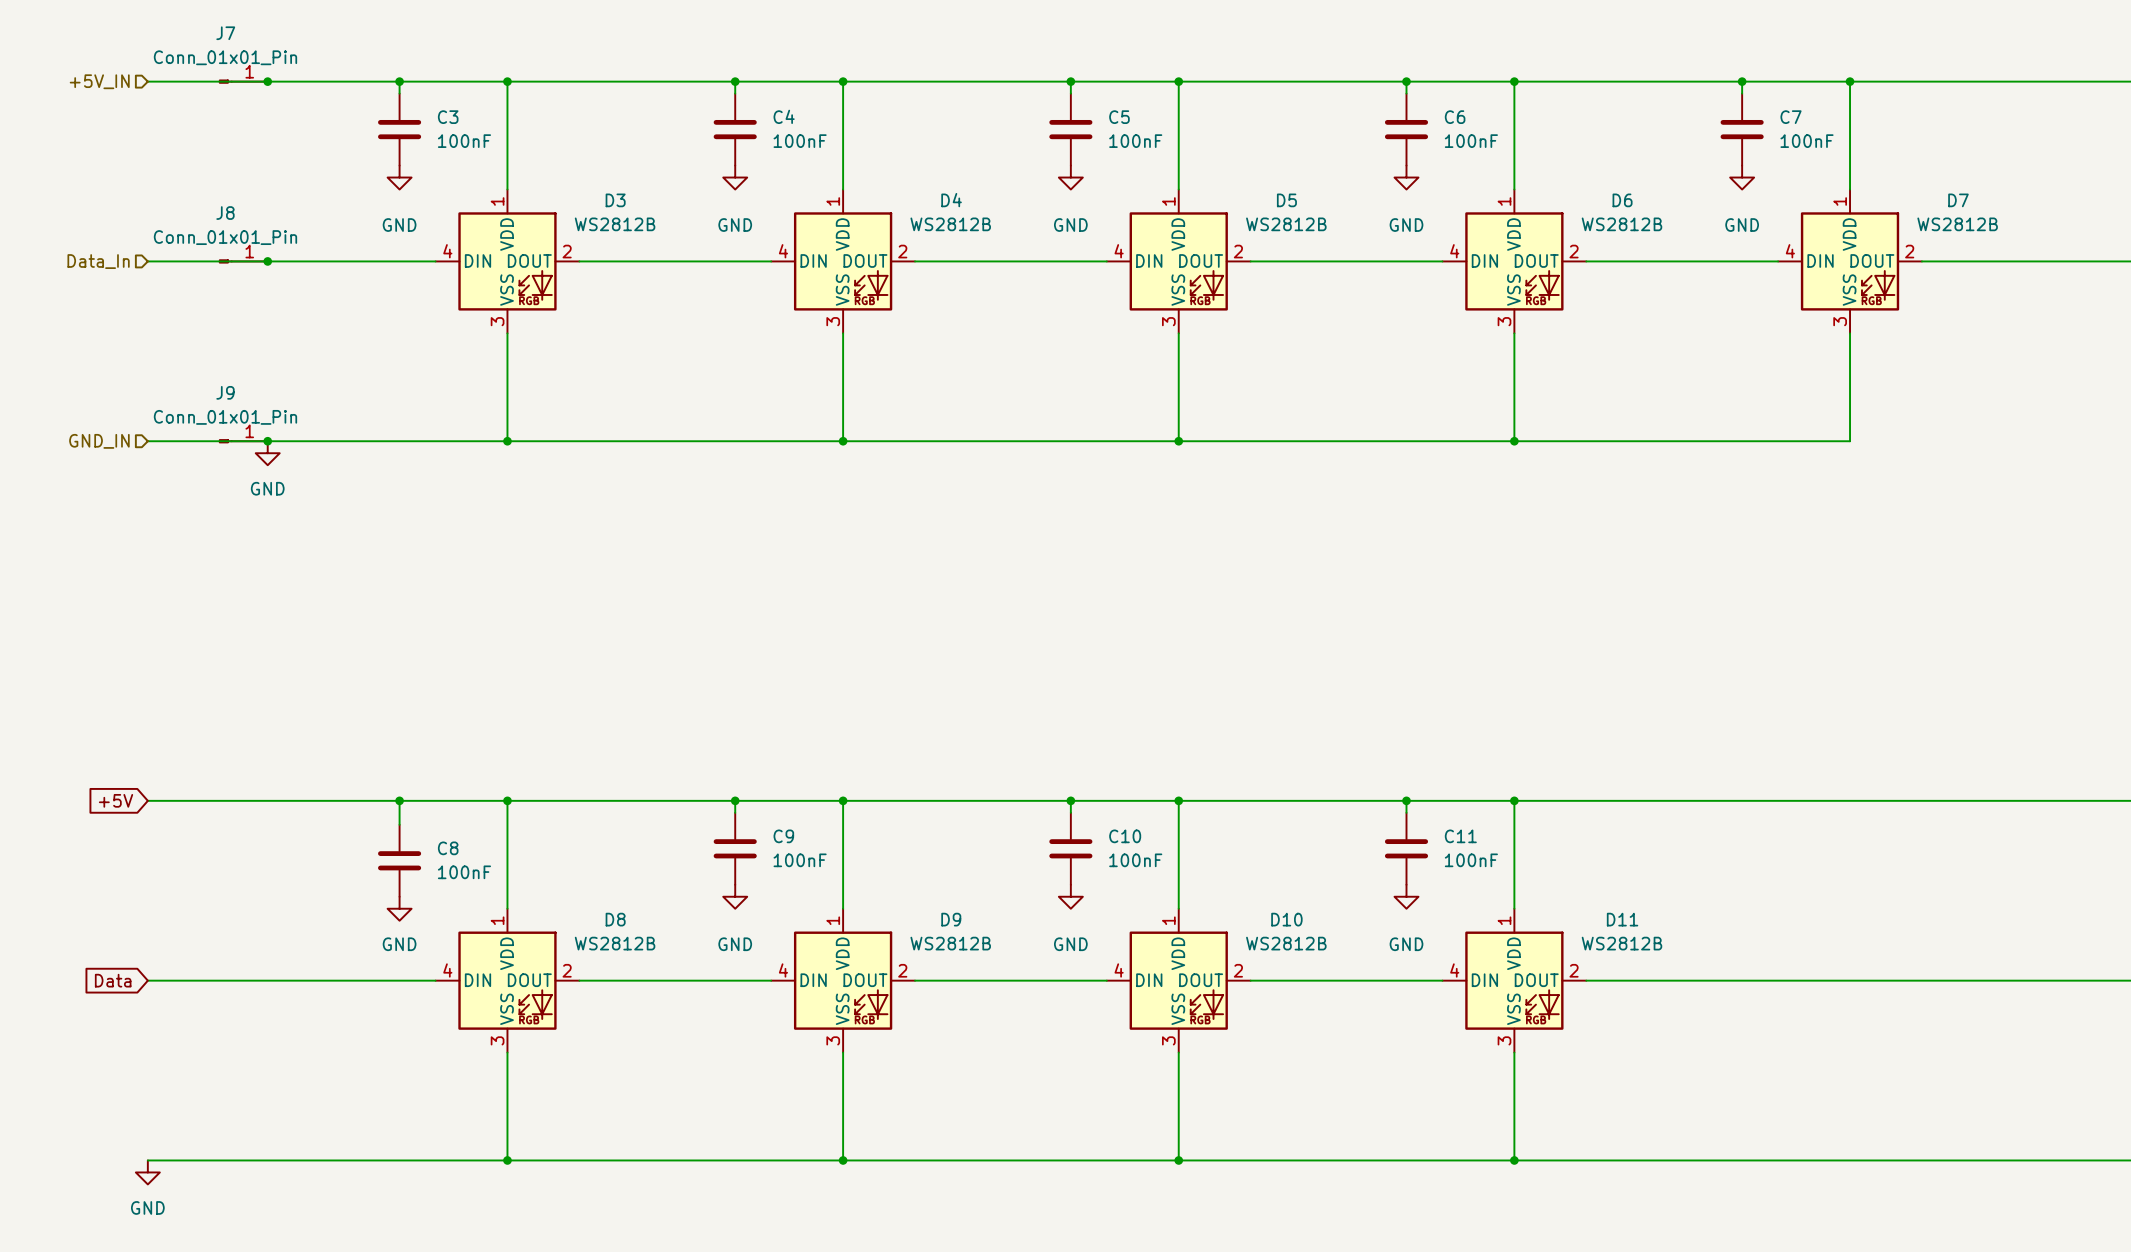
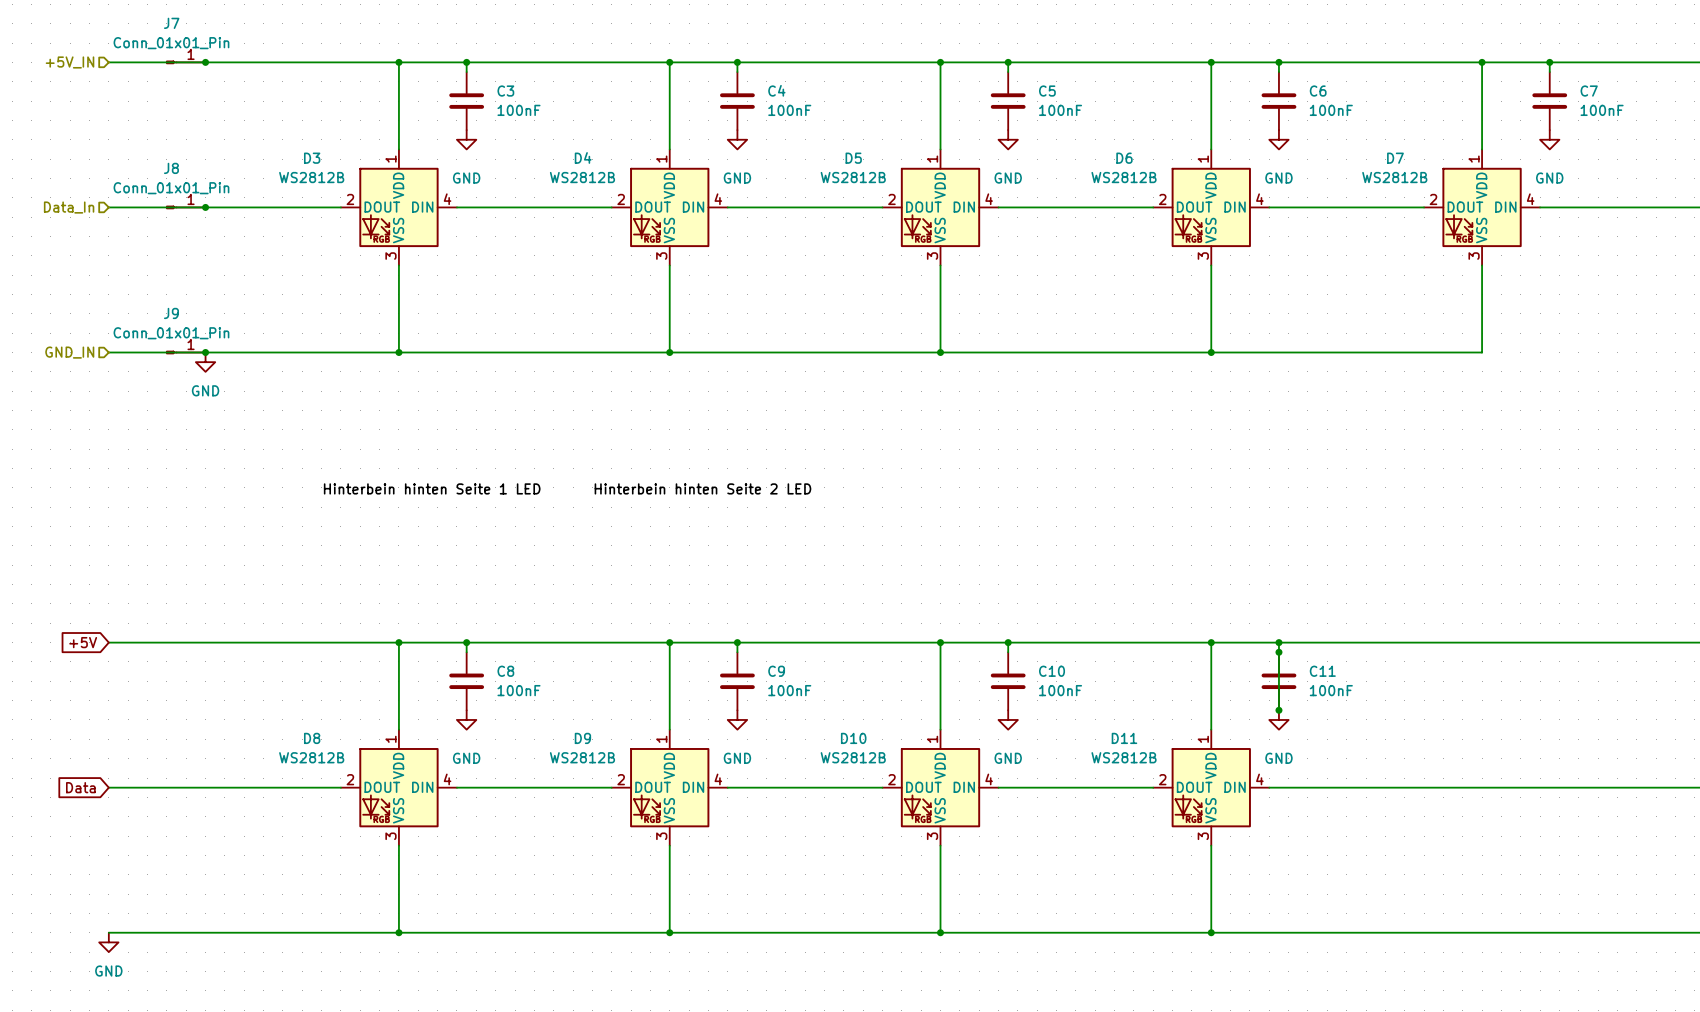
wire: (399, 81) (399, 93) -> none
junction: (399, 81) -> none
junction: none -> (466, 62)
wire: (735, 81) (735, 93) -> (466, 62) (466, 72)
junction: (735, 81) -> none
junction: none -> (737, 62)
wire: (1070, 81) (1070, 93) -> (737, 62) (737, 72)
junction: (1070, 81) -> none
junction: none -> (1008, 62)
wire: (1406, 81) (1406, 93) -> (1008, 62) (1008, 72)
junction: (1406, 81) -> none
junction: none -> (1278, 62)
wire: (1742, 81) (1742, 93) -> (1278, 62) (1278, 72)
junction: (1742, 81) -> none
wire: none -> (1549, 62) (1549, 72)
junction: none -> (1549, 62)
C3 position: (399, 129) -> (466, 101)
C4 position: (735, 129) -> (737, 101)
C5 position: (1070, 129) -> (1008, 101)
C6 position: (1406, 129) -> (1278, 101)
C7 position: (1742, 129) -> (1549, 101)
power symbol: GND (399, 177) -> none
power symbol: none -> GND (466, 139)
power symbol: GND (735, 177) -> none
power symbol: none -> GND (737, 139)
power symbol: GND (1070, 177) -> none
power symbol: none -> GND (1008, 139)
power symbol: GND (1406, 177) -> none
power symbol: none -> GND (1278, 139)
power symbol: GND (1742, 177) -> none
power symbol: none -> GND (1549, 139)
D3 flip: as is (507, 261) -> left-right (398, 207)
D4 flip: as is (843, 261) -> left-right (669, 207)
D5 flip: as is (1178, 261) -> left-right (940, 207)
D6 flip: as is (1514, 261) -> left-right (1211, 207)
D7 flip: as is (1850, 261) -> left-right (1482, 207)
label: none -> Hinterbein hinten Seite 1 LED (432, 488)
label: none -> Hinterbein hinten Seite 2 LED (702, 488)
wire: (399, 800) (399, 824) -> none
junction: (399, 800) -> none
junction: none -> (466, 642)
wire: (735, 800) (735, 812) -> (466, 642) (466, 652)
junction: (735, 800) -> none
junction: none -> (737, 642)
wire: (1070, 800) (1070, 812) -> (737, 642) (737, 652)
junction: (1070, 800) -> none
junction: none -> (1008, 642)
wire: (1406, 800) (1406, 812) -> (1008, 642) (1008, 652)
junction: (1406, 800) -> none
wire: none -> (1278, 642) (1278, 710)
junction: none -> (1278, 642)
junction: none -> (1278, 652)
C9 position: (735, 848) -> (737, 681)
C10 position: (1070, 848) -> (1008, 681)
C11 position: (1406, 848) -> (1278, 681)
C8 position: (399, 860) -> (466, 681)
junction: none -> (1278, 710)
power symbol: none -> GND (466, 719)
power symbol: GND (735, 896) -> none
power symbol: none -> GND (737, 719)
power symbol: GND (1070, 896) -> none
power symbol: none -> GND (1008, 719)
power symbol: GND (1406, 896) -> none
power symbol: none -> GND (1278, 719)
power symbol: GND (399, 908) -> none
D8 flip: as is (507, 980) -> left-right (398, 787)
D9 flip: as is (843, 980) -> left-right (669, 787)
D10 flip: as is (1178, 980) -> left-right (940, 787)
D11 flip: as is (1514, 980) -> left-right (1211, 787)

